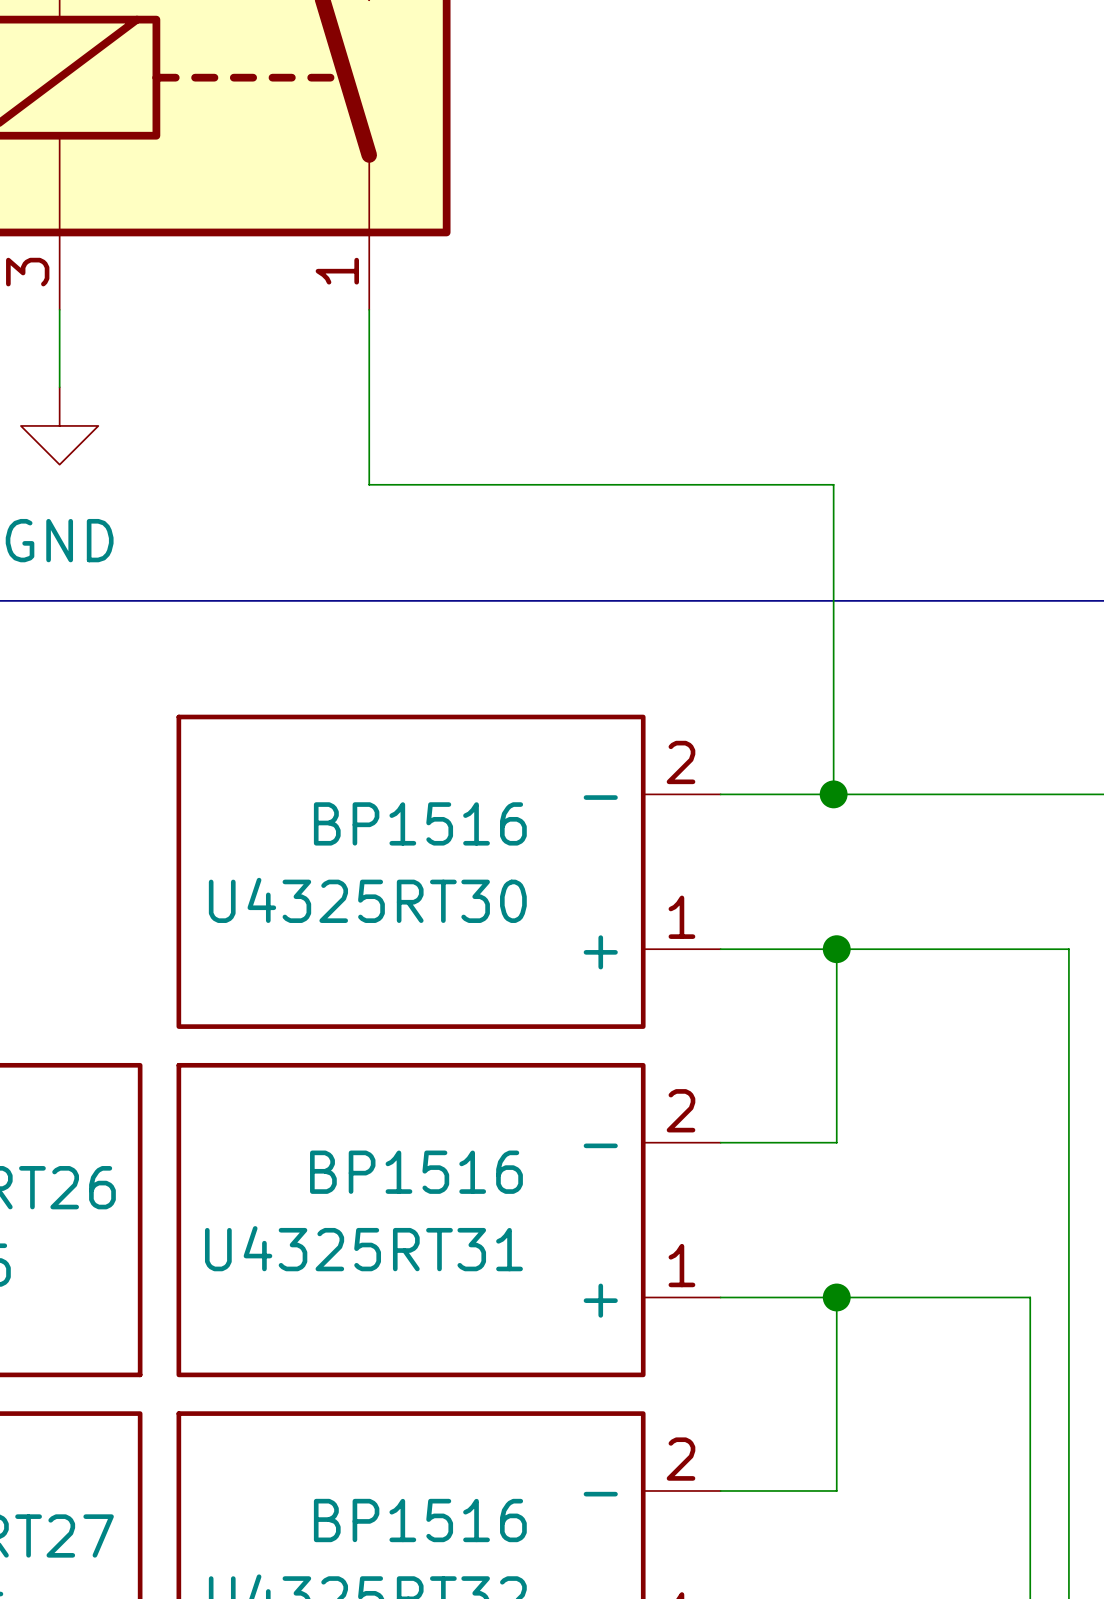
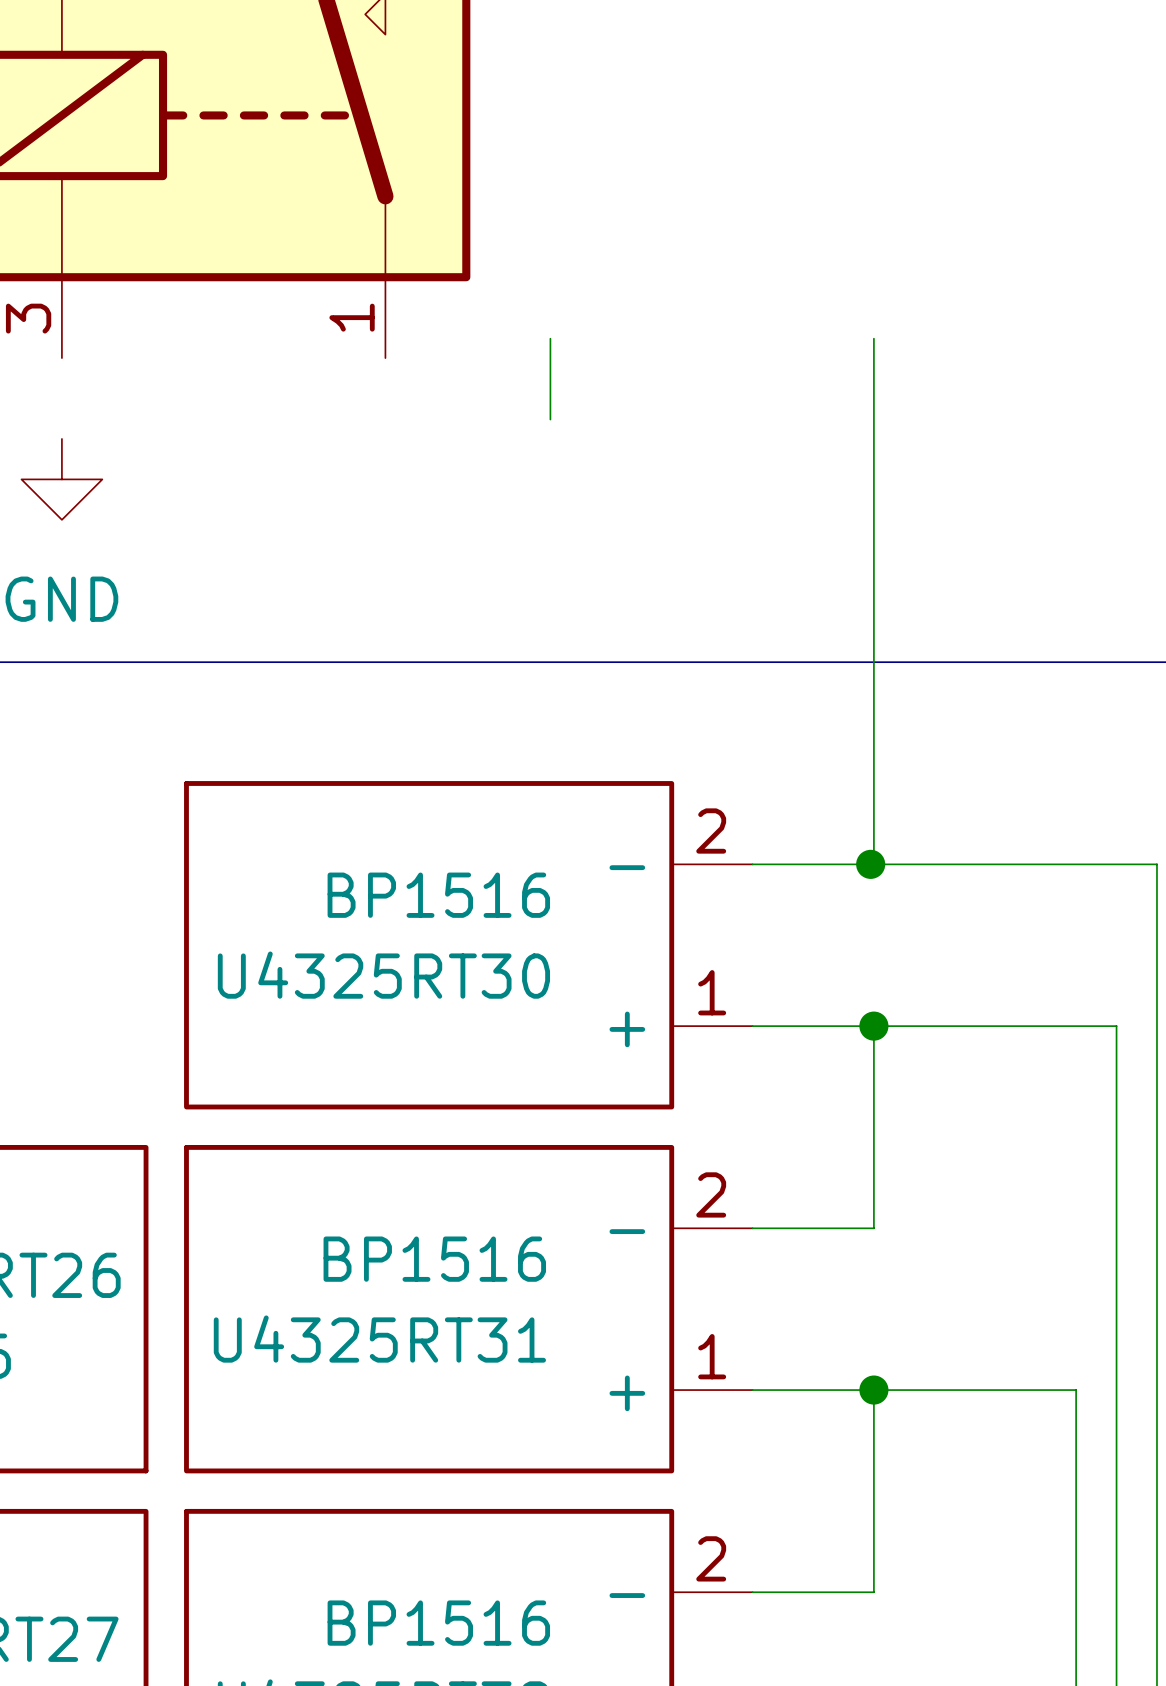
wire: none -> (873, 338) (873, 864)
wire: (59, 309) (59, 387) -> (550, 338) (550, 419)
wire: (369, 309) (369, 484) (833, 484) (833, 794) -> none

